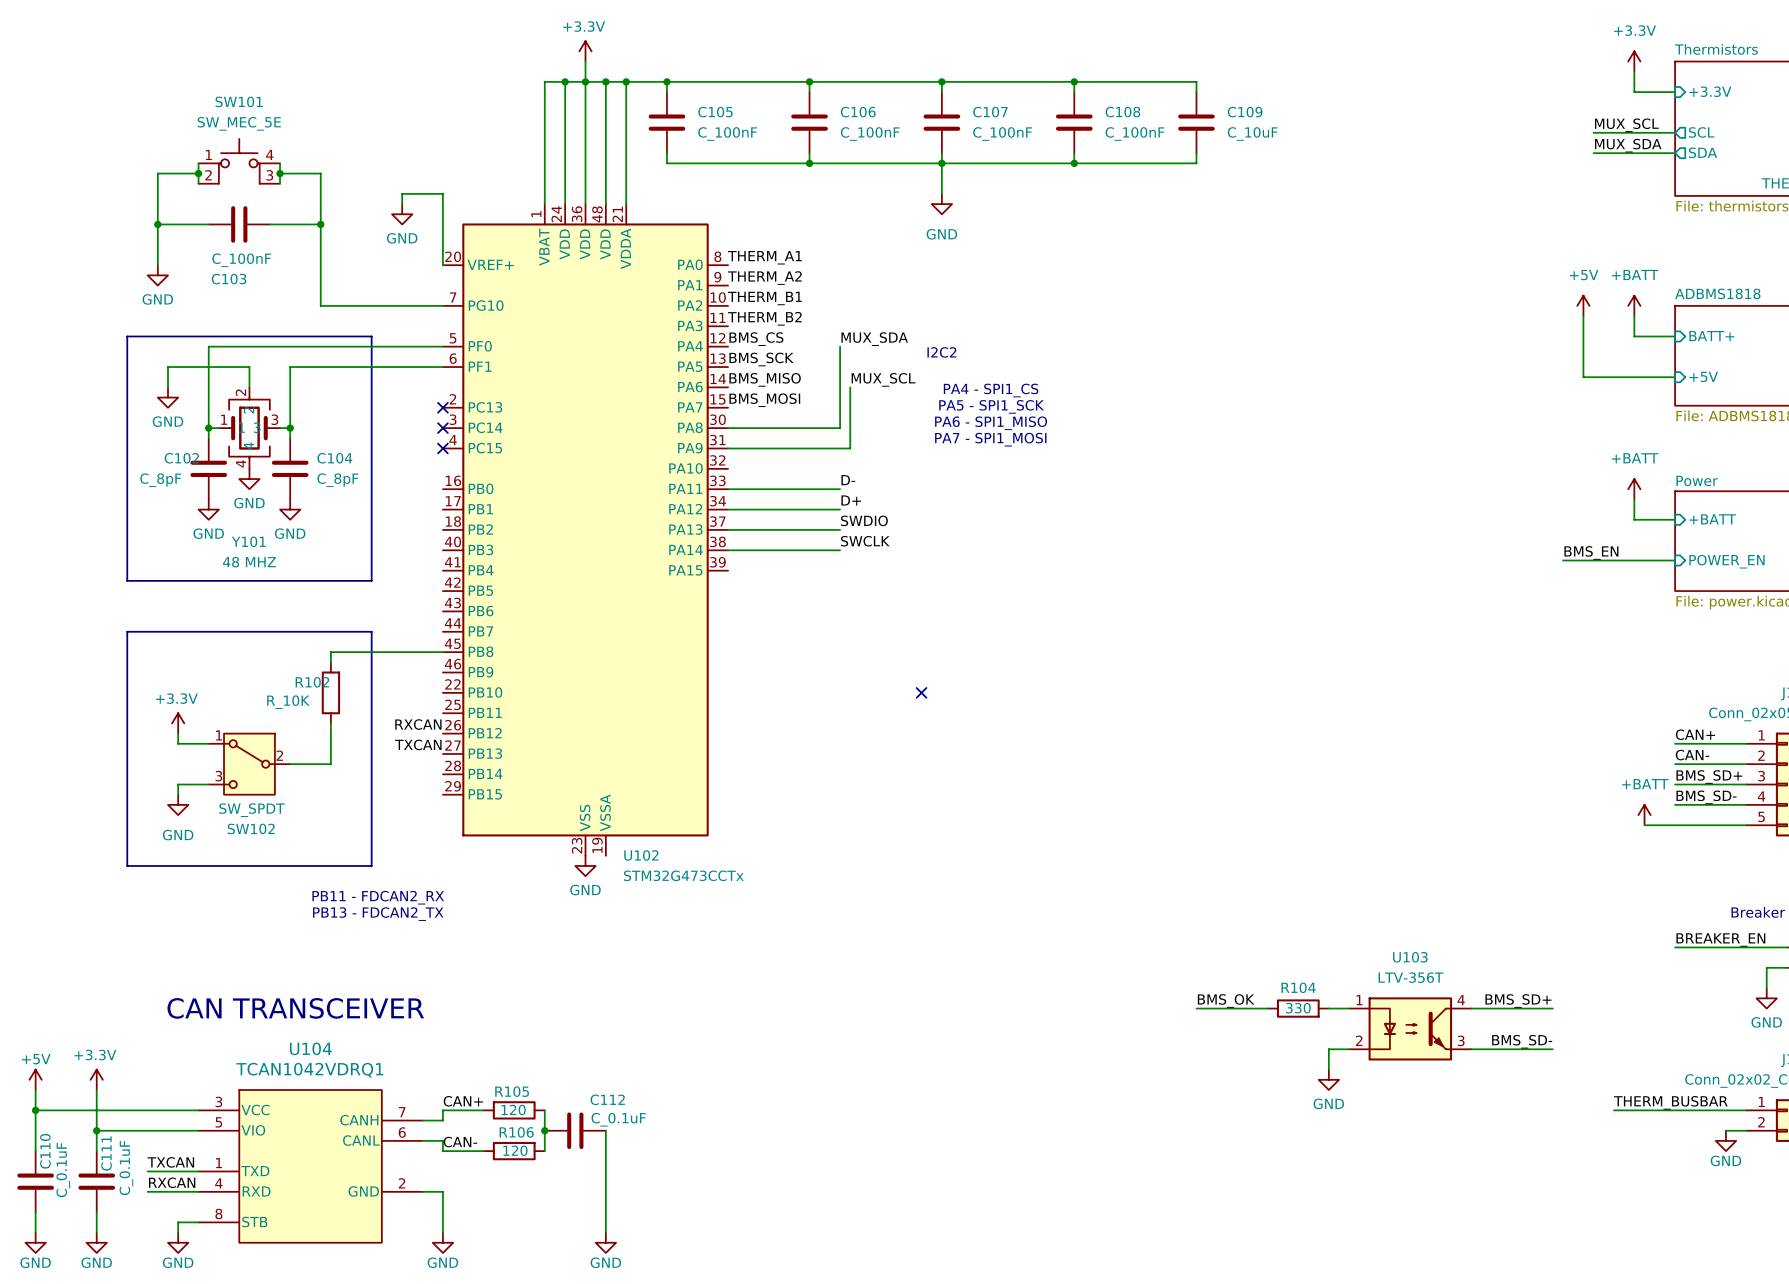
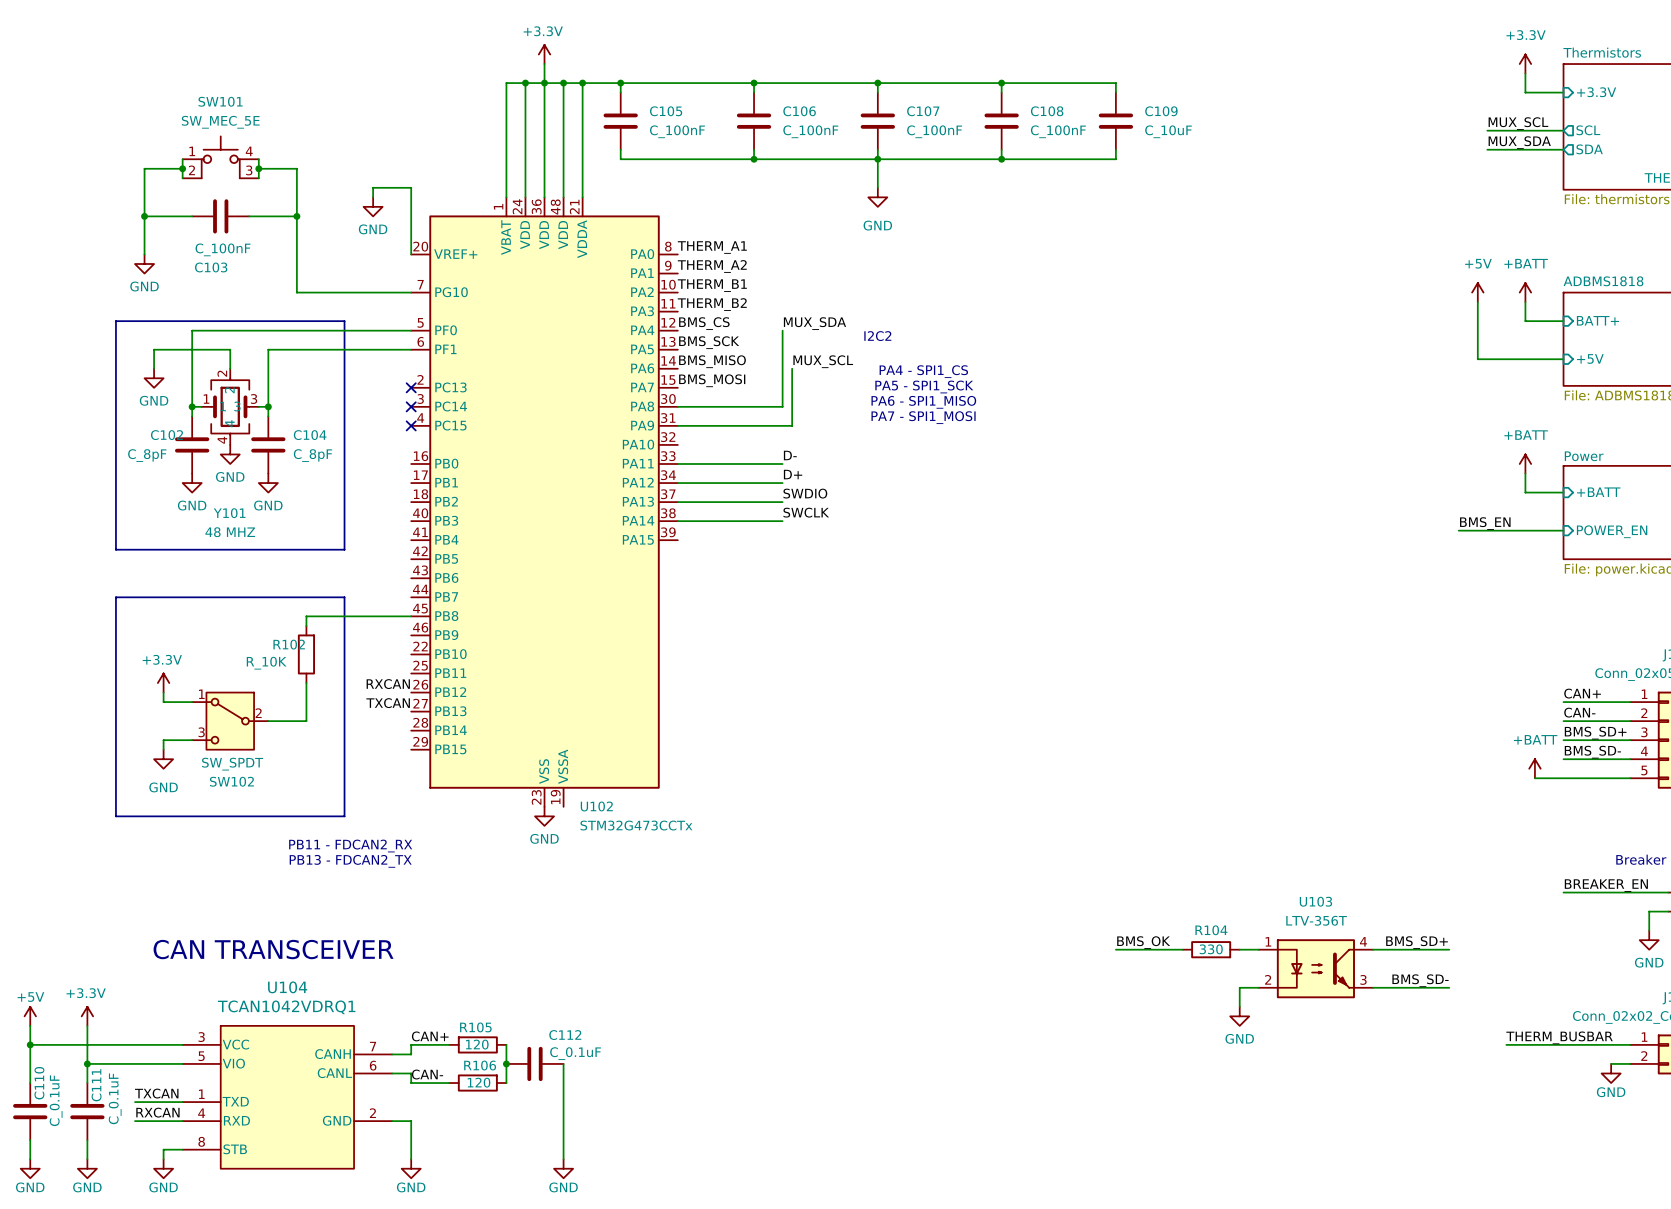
no-connect mark: (921, 692) -> none

